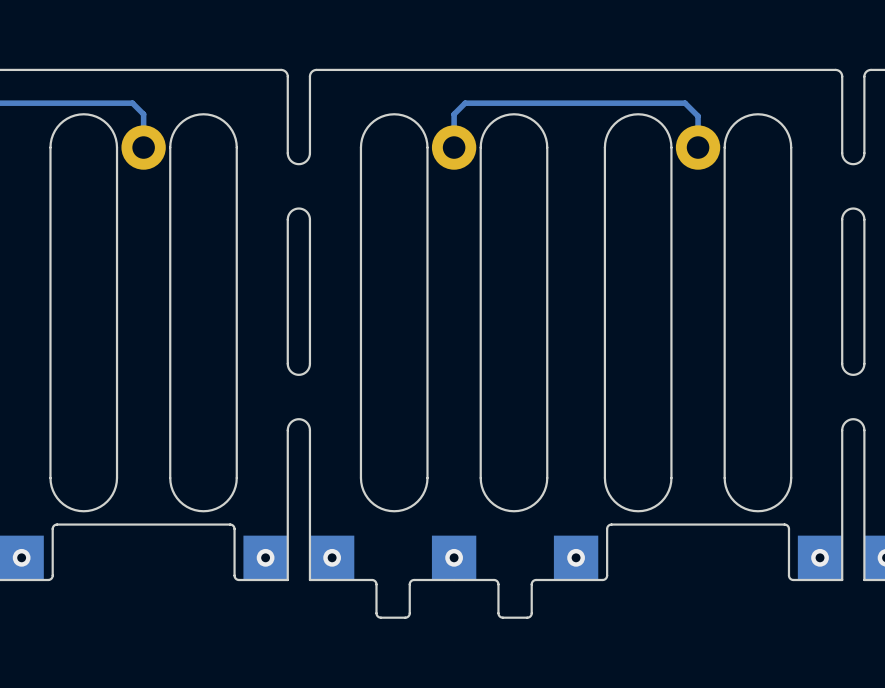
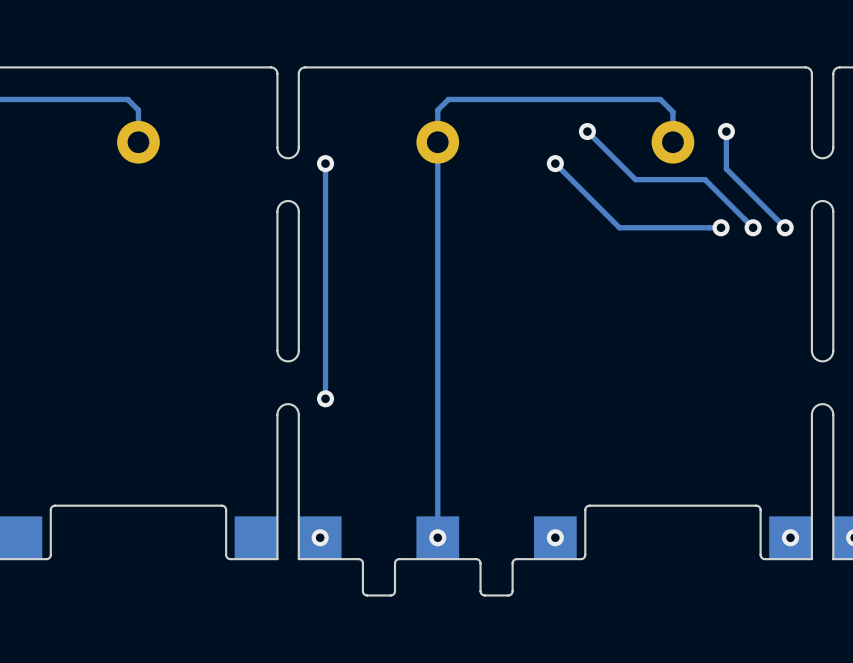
track: none -> (587, 131) (635, 179) (705, 179) (753, 227)
via: none -> (587, 131)
track: none -> (726, 131) (726, 168) (785, 227)
via: none -> (726, 131)
board edge: (117, 147) (116, 482) (112, 494) (104, 504) (92, 510) (79, 510) (71, 508) (60, 501) (53, 490) (50, 482) (50, 143) (54, 130) (63, 121) (75, 115) (88, 114) (100, 118) (110, 127) (114, 134) (117, 147) -> none
board edge: (236, 147) (236, 477) (236, 482) (232, 494) (223, 504) (212, 510) (199, 510) (190, 508) (179, 501) (172, 490) (170, 482) (170, 143) (174, 130) (183, 121) (194, 115) (207, 114) (220, 118) (229, 127) (234, 134) (236, 143) (236, 147) -> none
board edge: (427, 147) (427, 477) (427, 482) (423, 494) (414, 504) (402, 510) (389, 510) (381, 508) (370, 501) (363, 490) (361, 482) (361, 143) (365, 130) (373, 121) (385, 115) (394, 114) (406, 116) (417, 124) (424, 134) (427, 143) (427, 147) -> none
track: none -> (437, 142) (437, 537)
board edge: (547, 147) (546, 482) (542, 494) (534, 504) (522, 510) (509, 510) (501, 508) (490, 501) (483, 490) (481, 482) (481, 143) (485, 130) (493, 121) (505, 115) (518, 114) (530, 118) (540, 127) (544, 134) (547, 147) -> none
board edge: (671, 147) (671, 482) (666, 494) (658, 504) (646, 510) (633, 510) (625, 508) (614, 501) (607, 490) (605, 482) (605, 143) (609, 130) (617, 121) (629, 115) (642, 114) (654, 118) (664, 127) (668, 134) (671, 147) -> none
board edge: (791, 147) (791, 477) (790, 482) (786, 494) (778, 504) (766, 510) (753, 510) (745, 508) (734, 501) (727, 490) (724, 482) (724, 143) (729, 130) (737, 121) (749, 115) (762, 114) (774, 118) (784, 127) (788, 134) (790, 143) (791, 147) -> none
track: none -> (325, 163) (325, 398)
via: none -> (325, 163)
track: none -> (555, 163) (619, 227) (721, 227)
via: none -> (555, 163)
via: none -> (721, 227)
via: none -> (753, 227)
via: none -> (785, 227)
via: none -> (325, 398)
via: (21, 557) -> none
via: (265, 557) -> none

